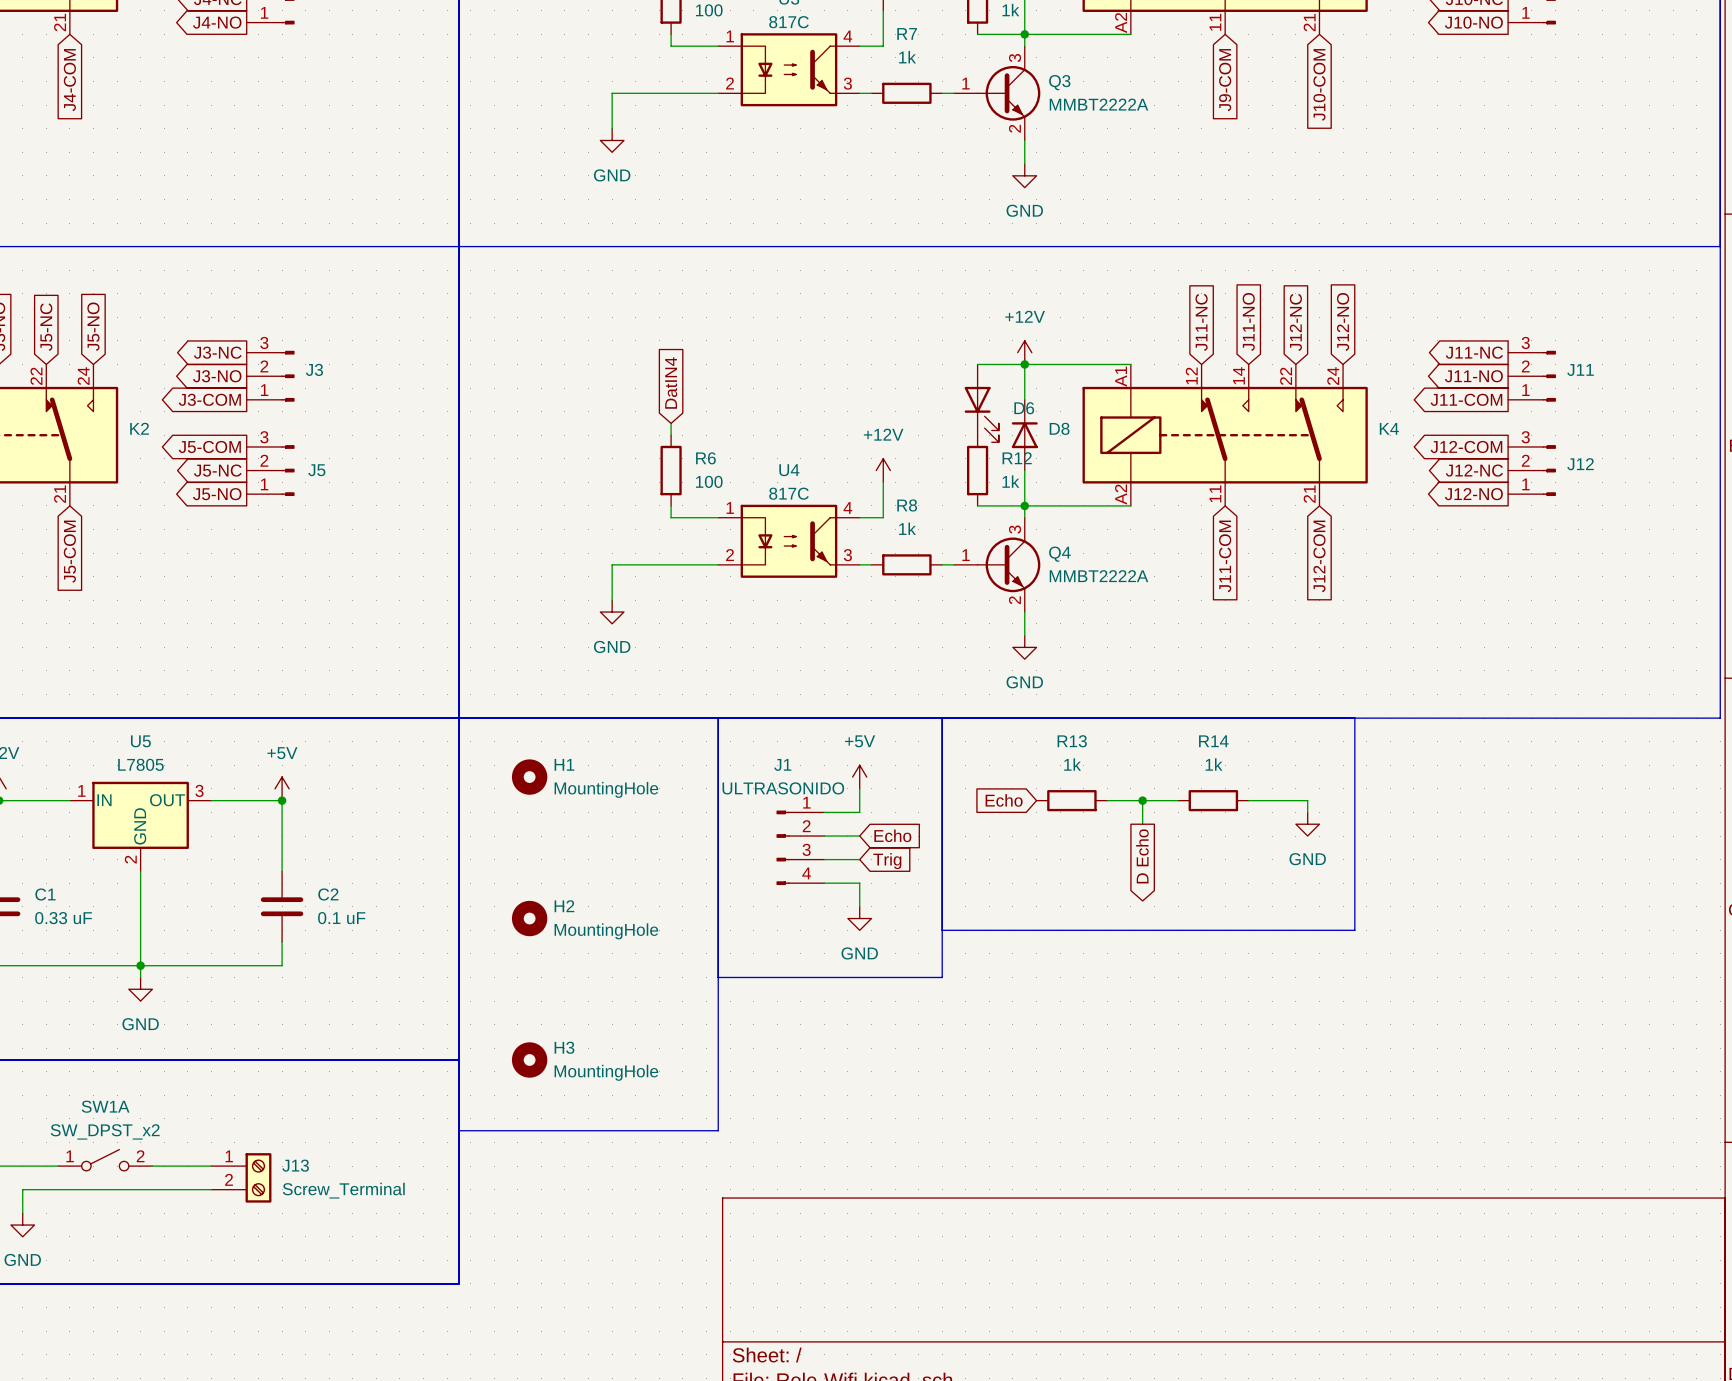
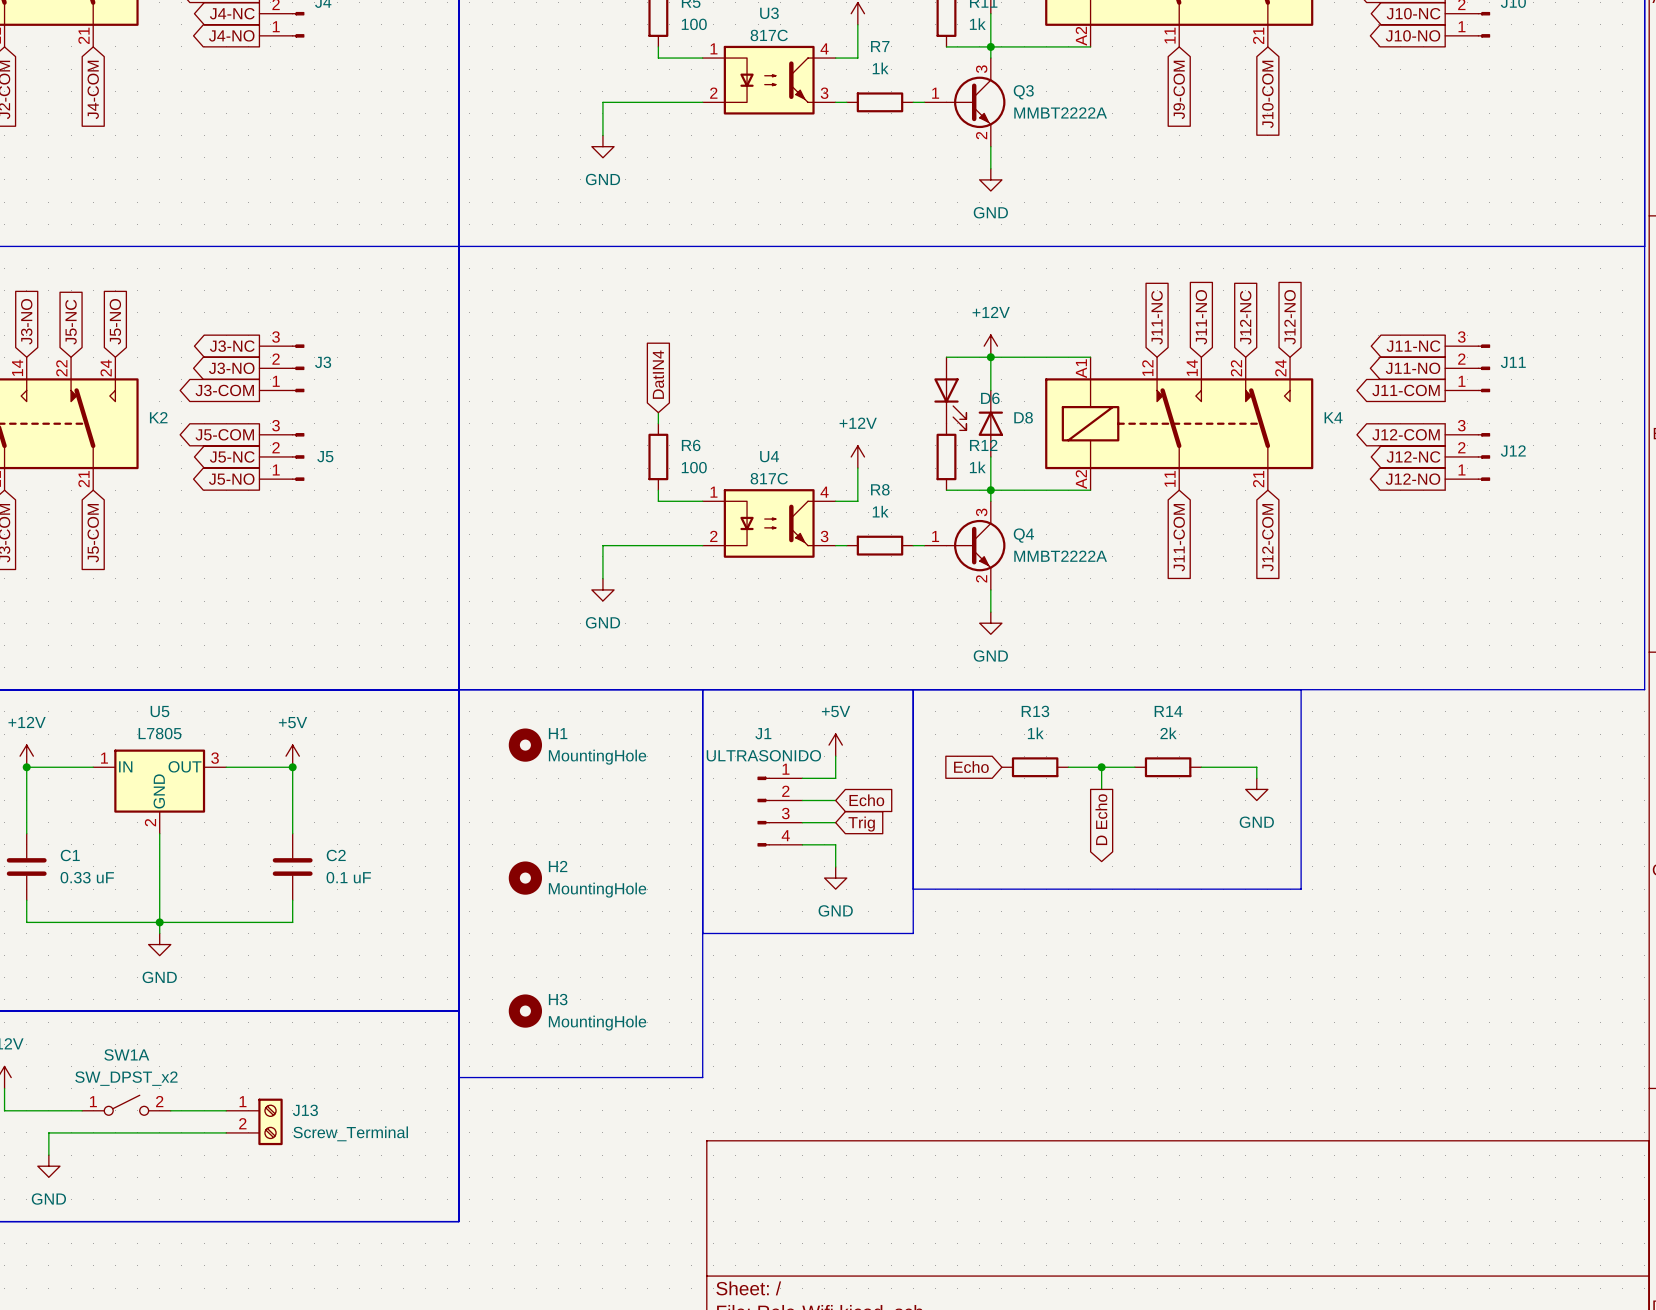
R14 value: 1k (1214, 764) -> 2k (1168, 733)

